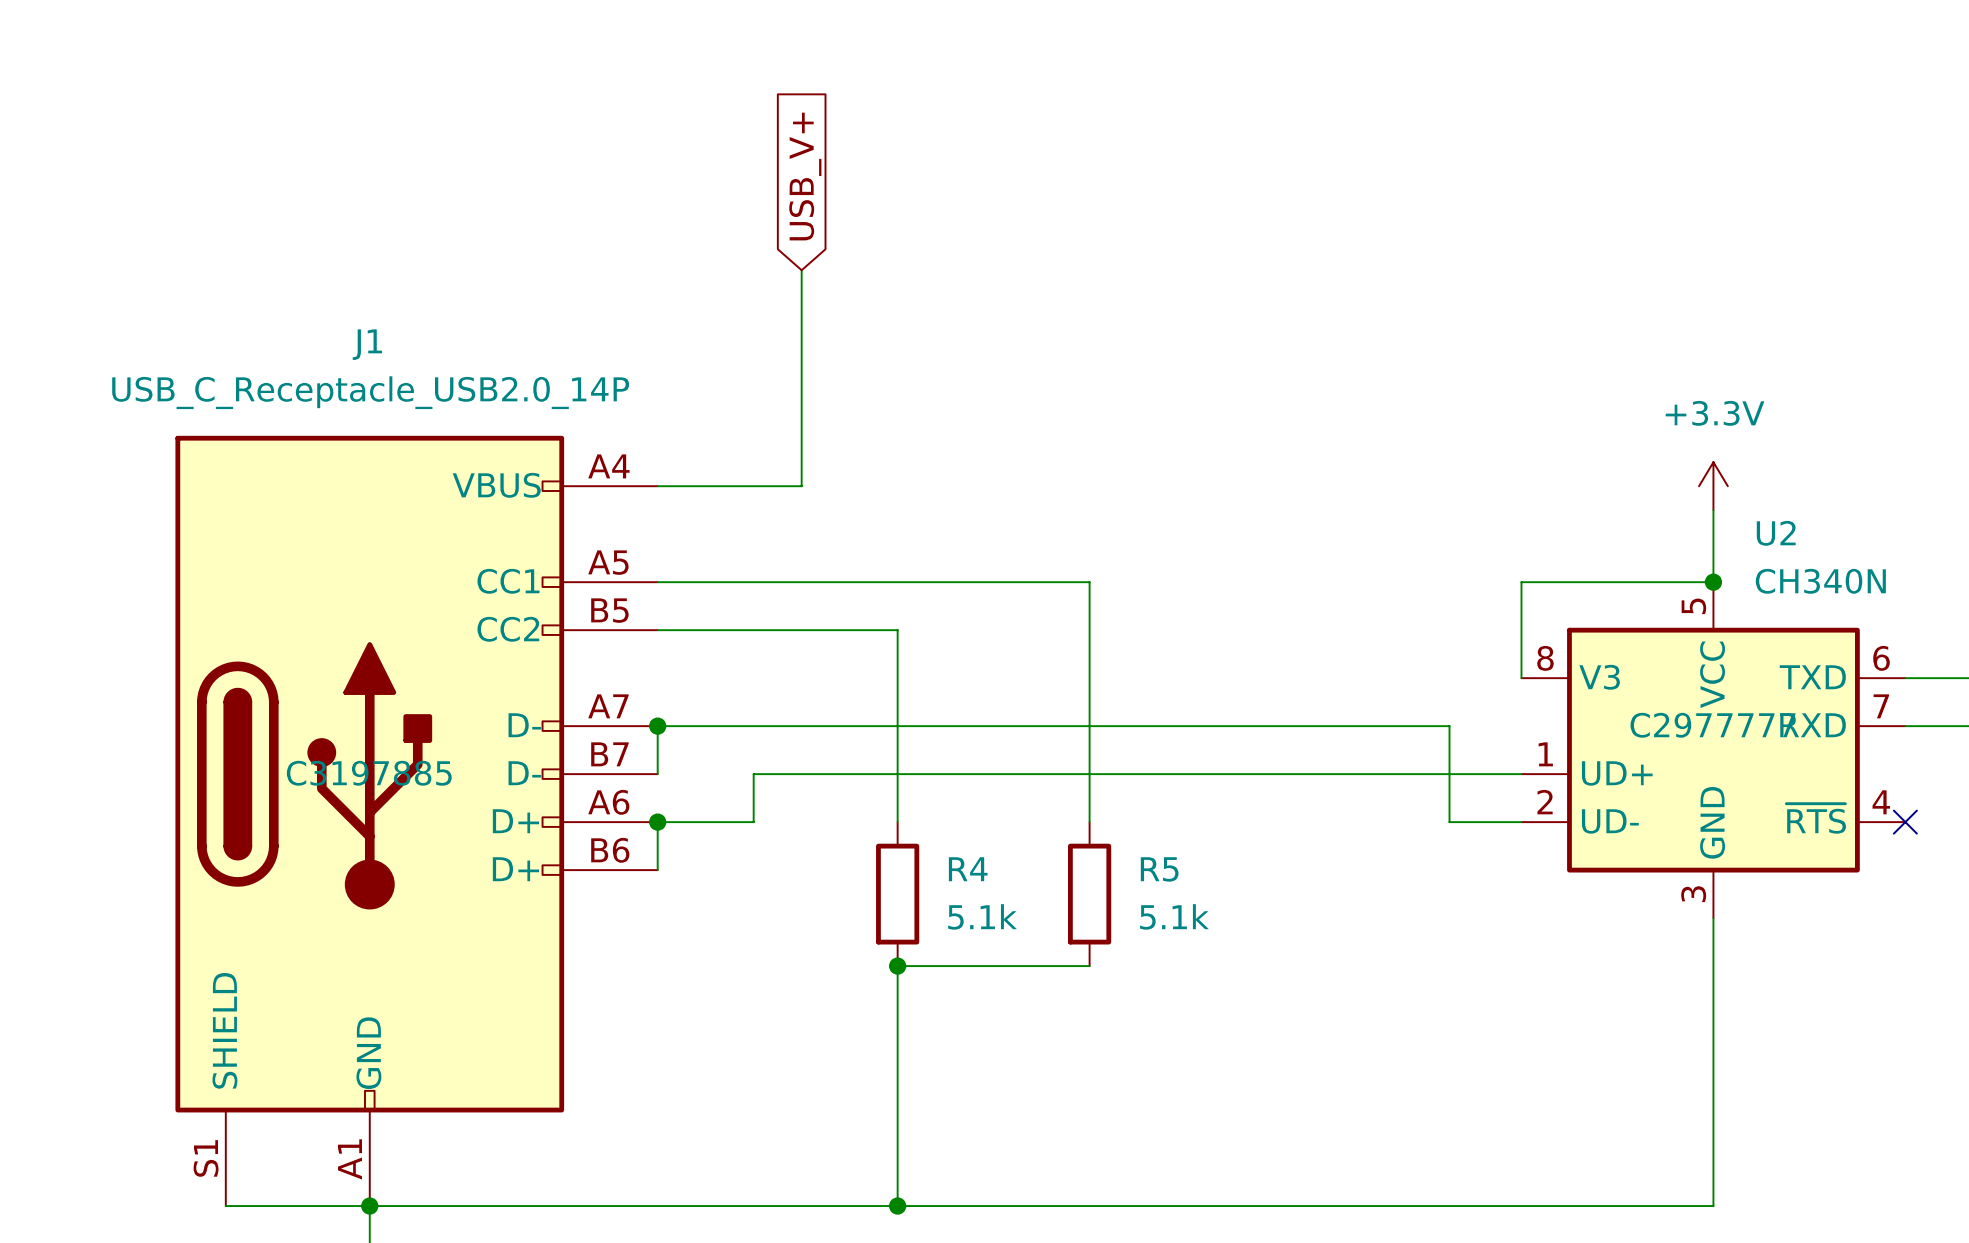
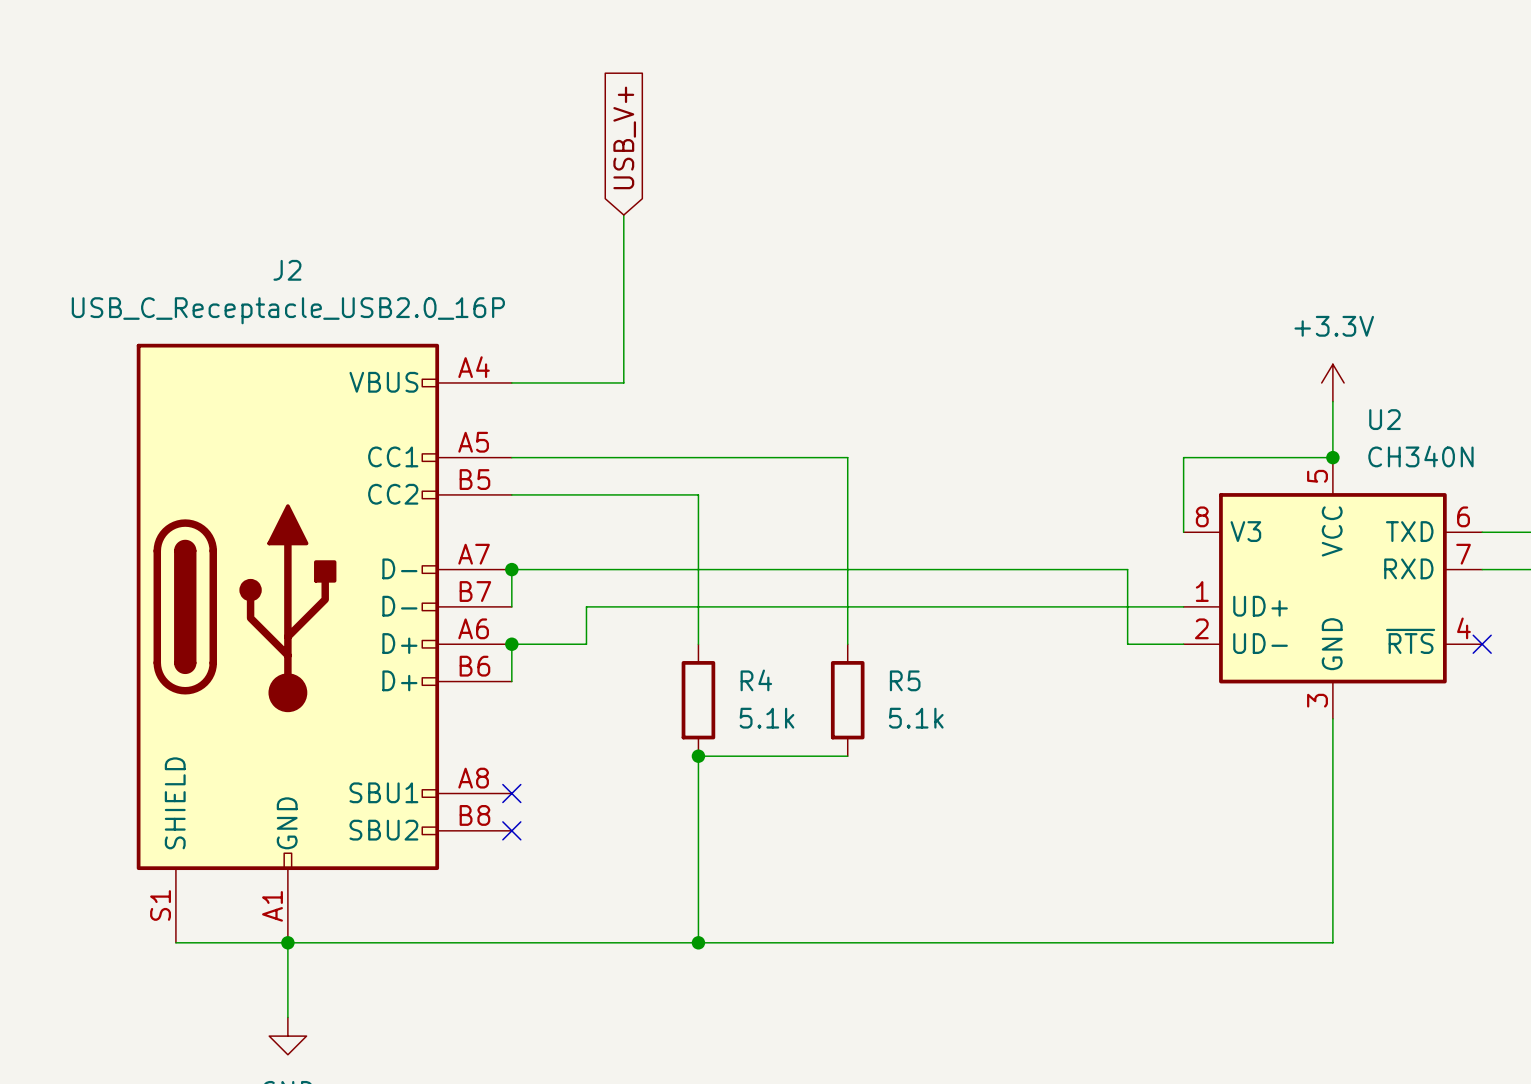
U2 text: C2977777 (1712, 725) -> none
J1: USB_C_Receptacle_USB2.0_14P (416, 820) -> none
J2: none -> USB_C_Receptacle_USB2.0_16P (324, 643)
no-connect mark: none -> (511, 793)
no-connect mark: none -> (511, 830)

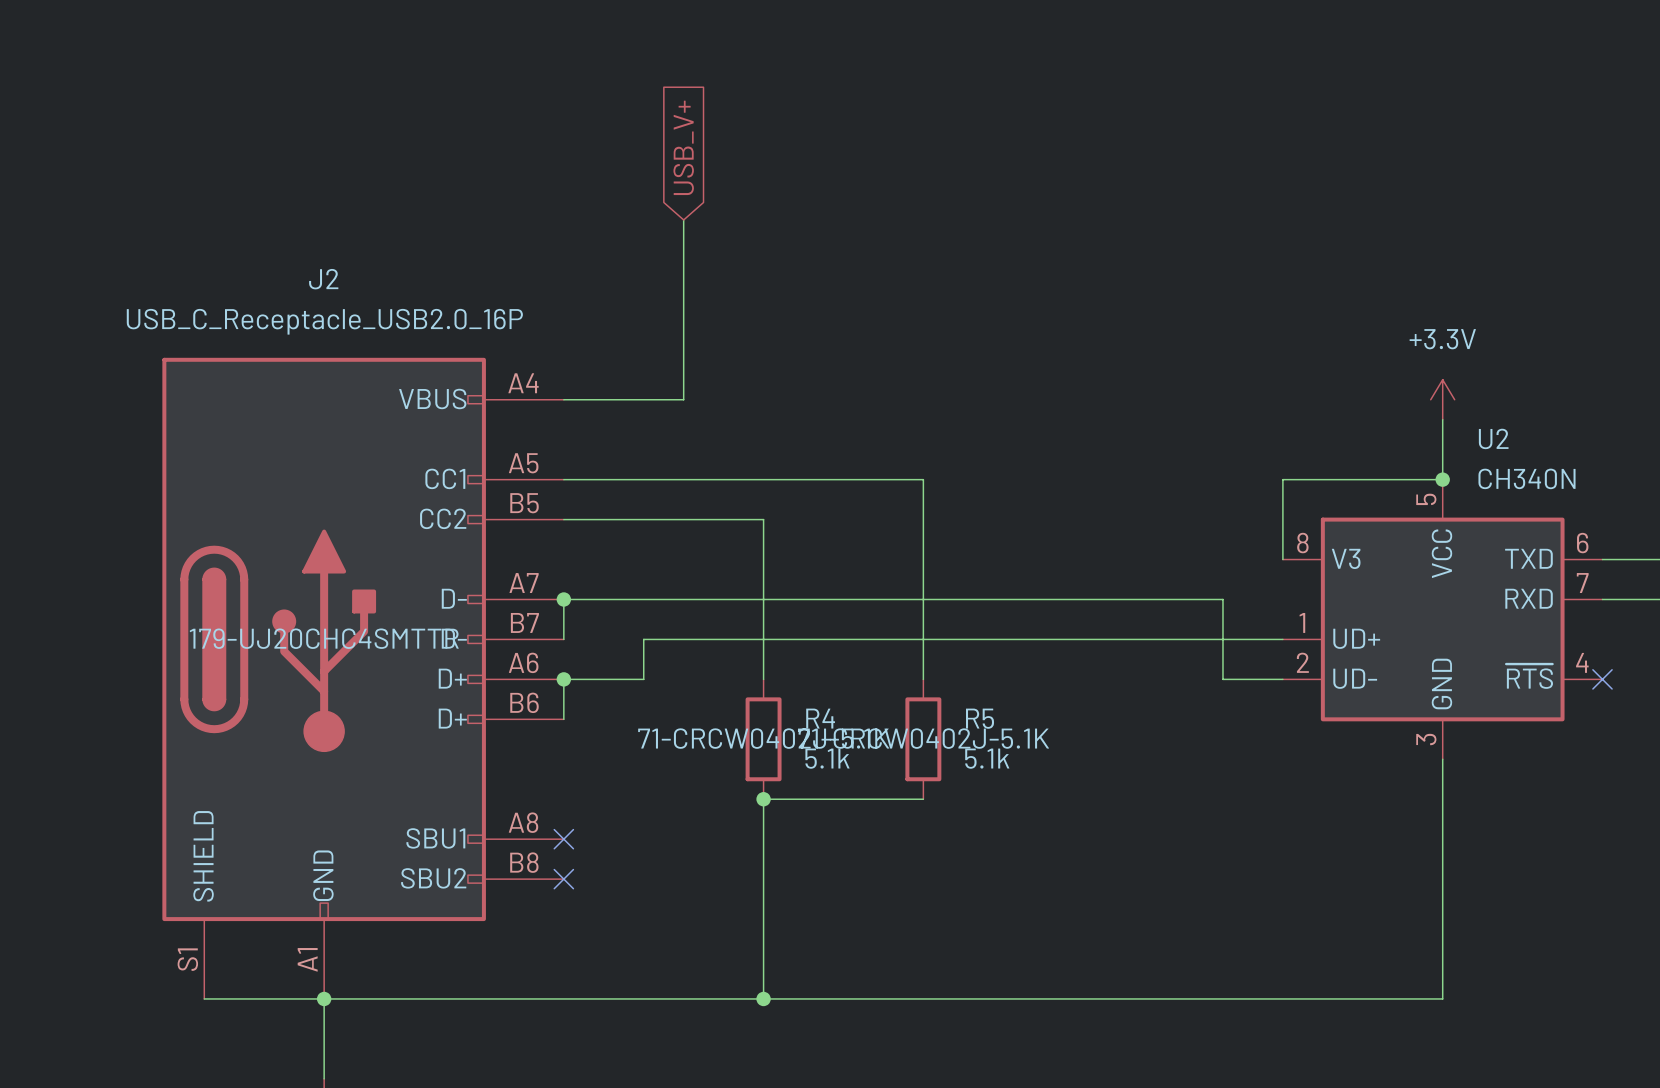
J2 text: none -> 179-UJ20CHC4SMTTR (324, 638)
R4 text: none -> 71-CRCW0402J-5.1K (763, 738)
R5 text: none -> 71-CRCW0402J-5.1K (923, 738)

